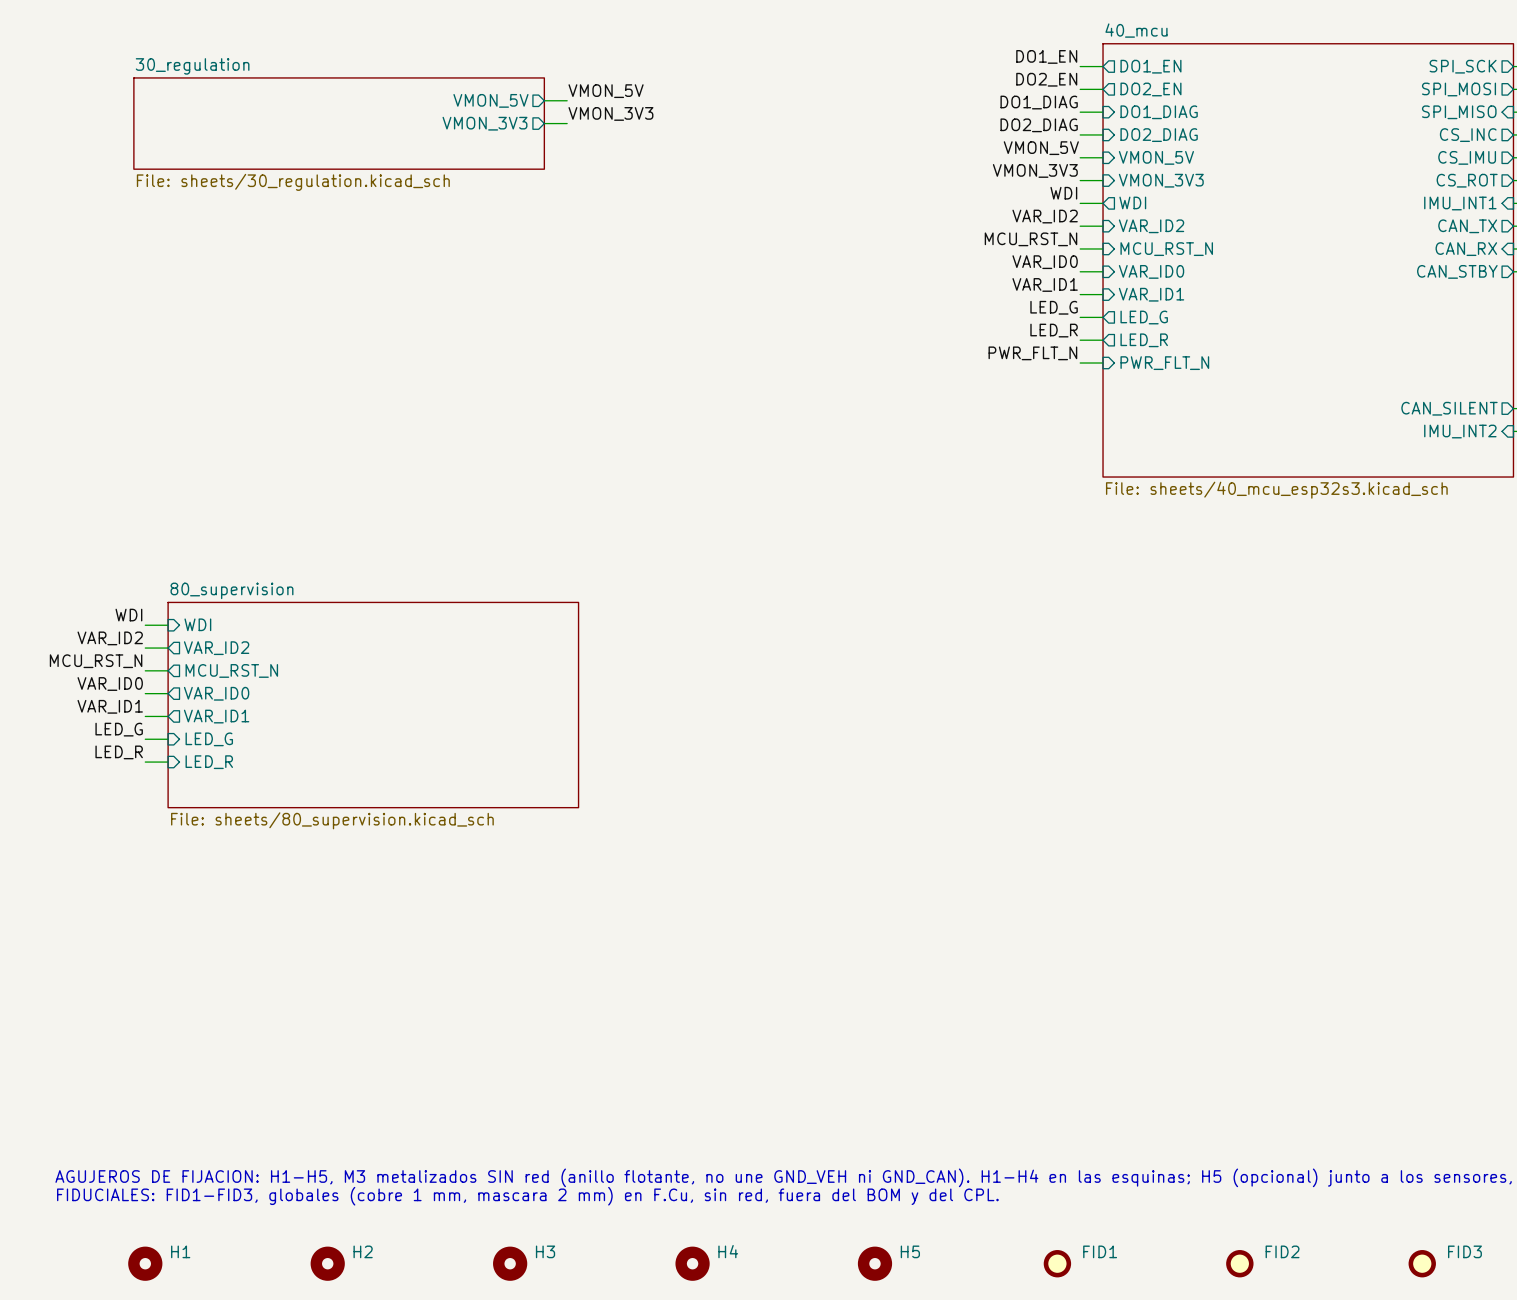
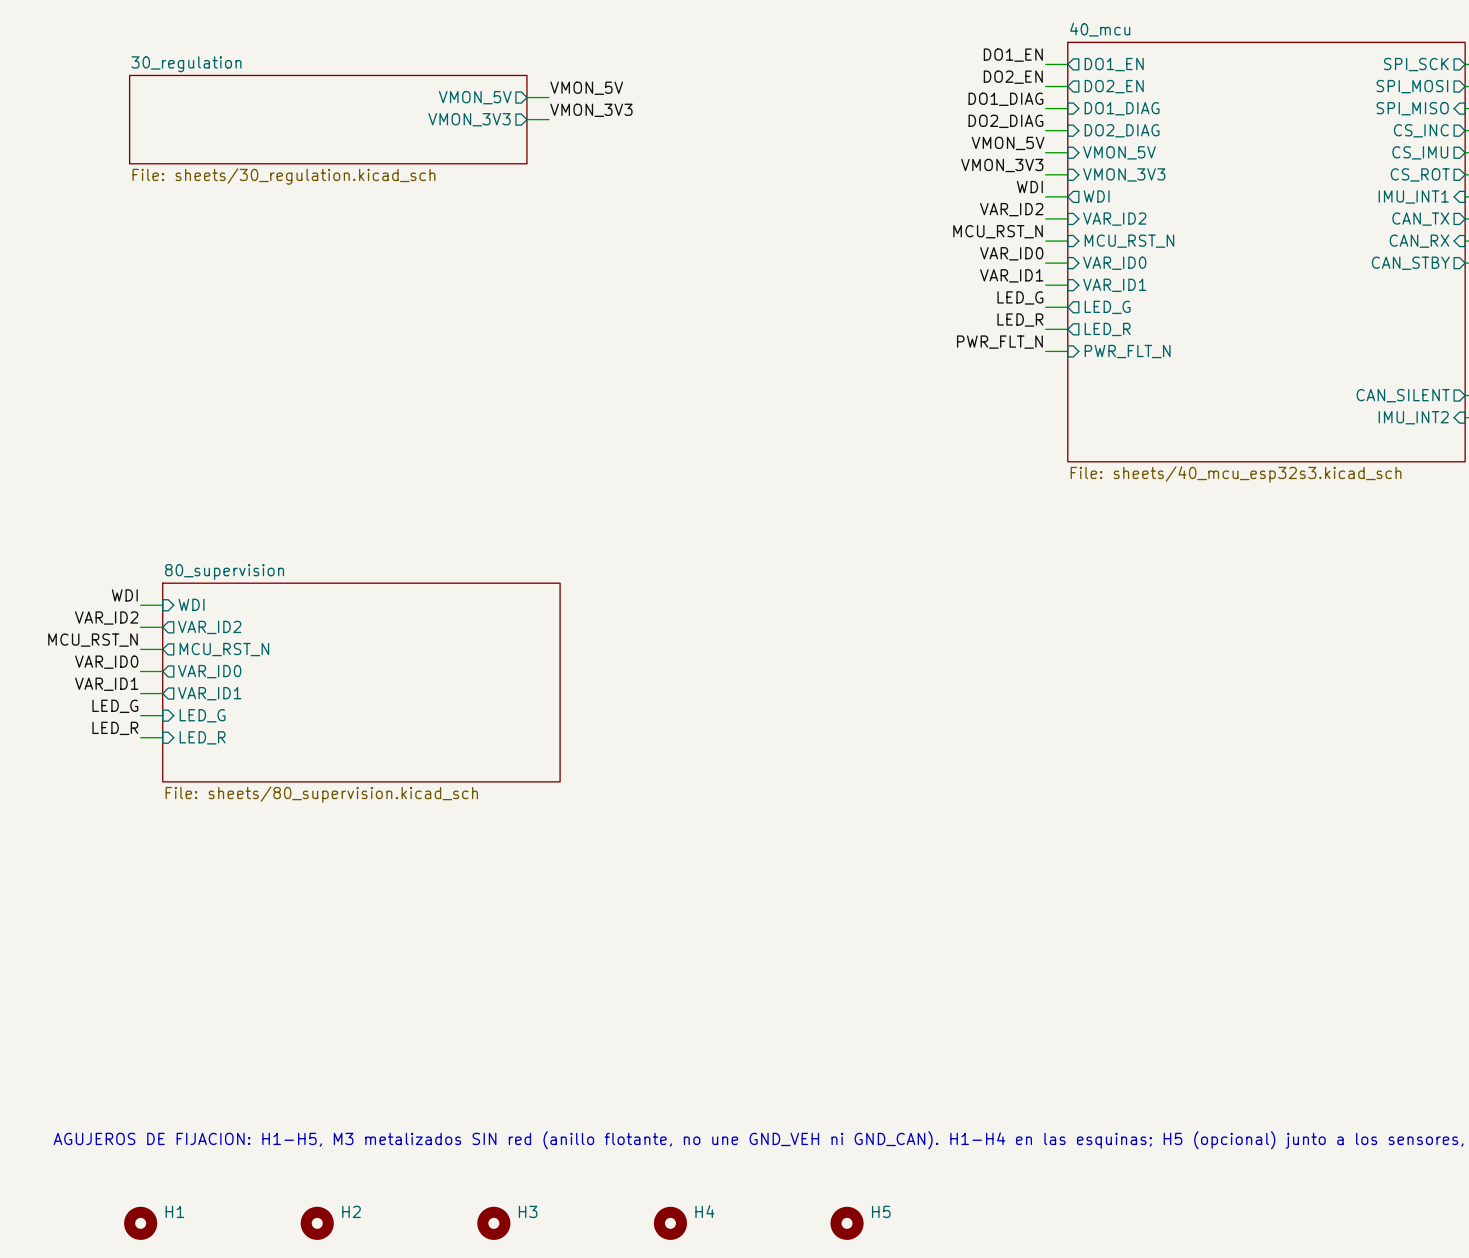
text: FIDUCIALES: FID1-FID3, globales (cobre 1 mm, mascara 2 mm) en F.Cu, sin red, fuera del BOM y del CPL. (527, 1196) -> none
FID1: (1057, 1263) -> none
FID2: (1239, 1263) -> none
FID3: (1422, 1263) -> none

